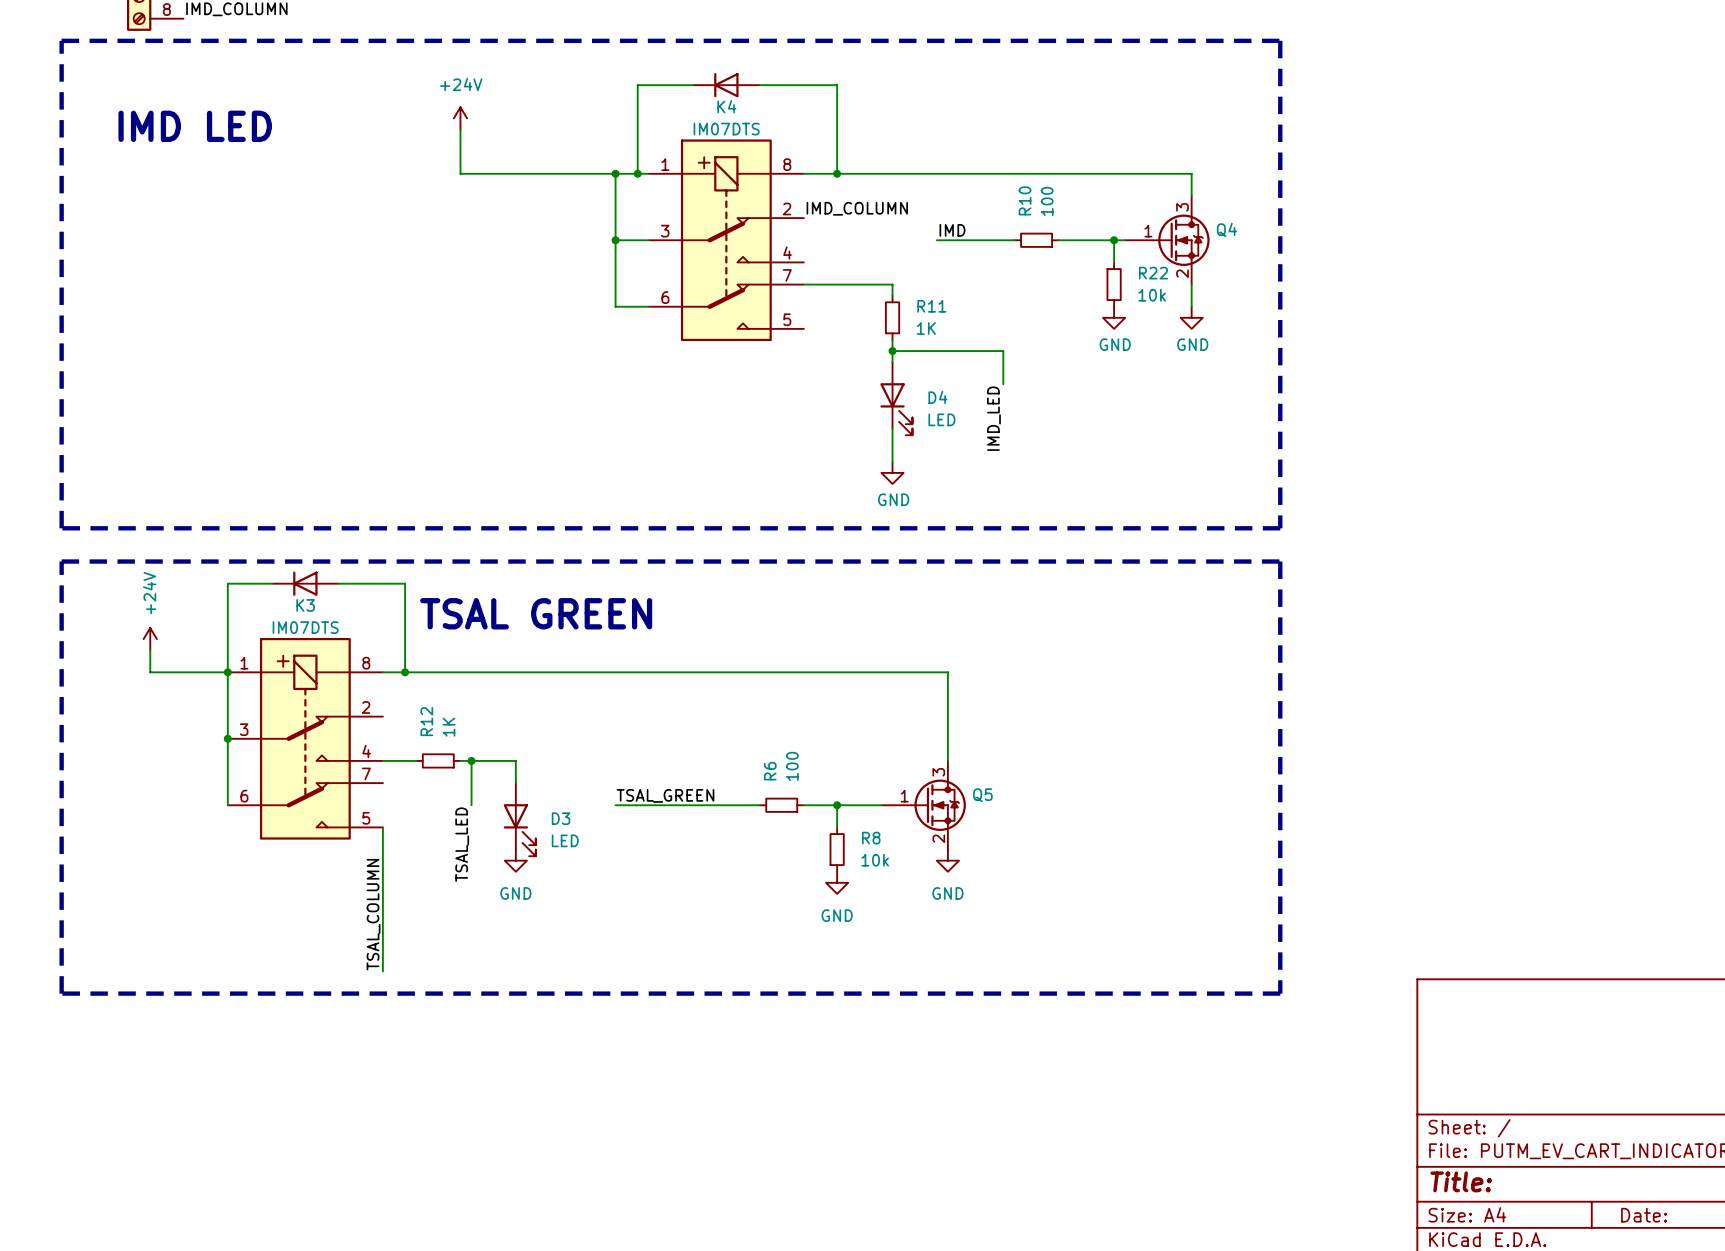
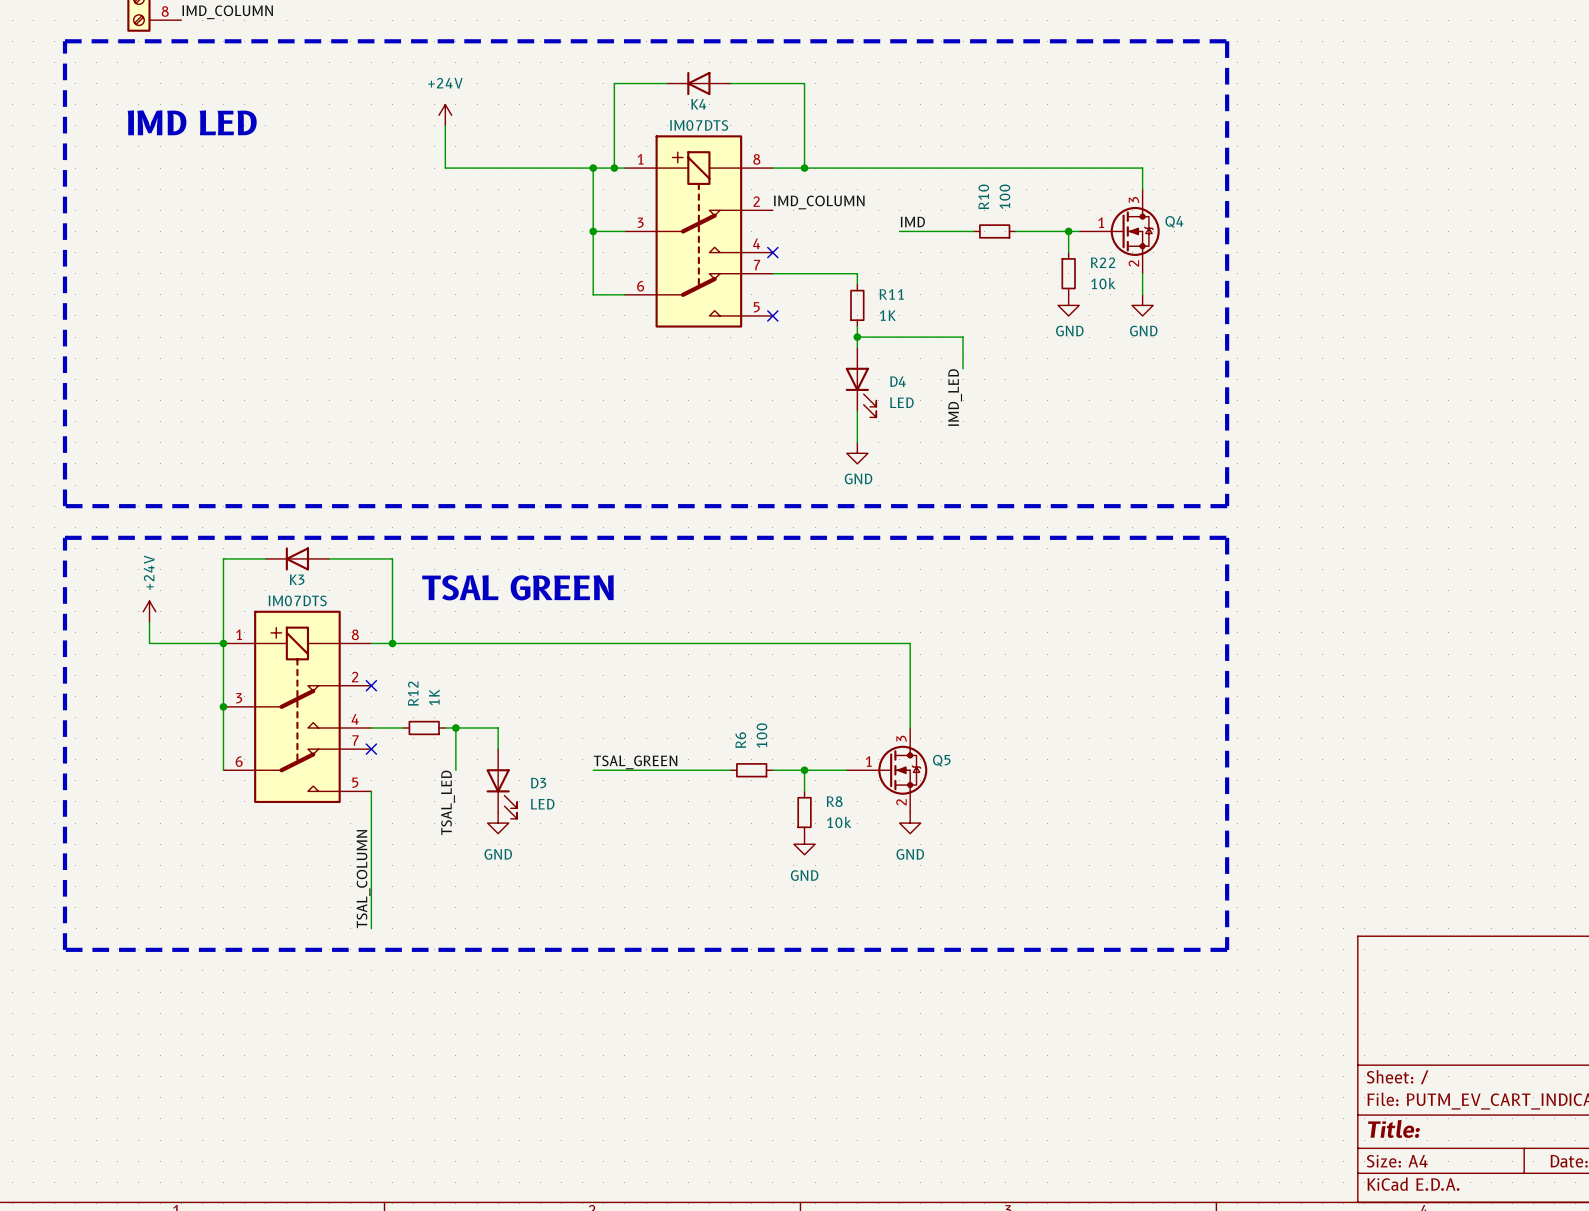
no-connect mark: none -> (772, 252)
no-connect mark: none -> (772, 315)
no-connect mark: none -> (371, 685)
no-connect mark: none -> (371, 749)

